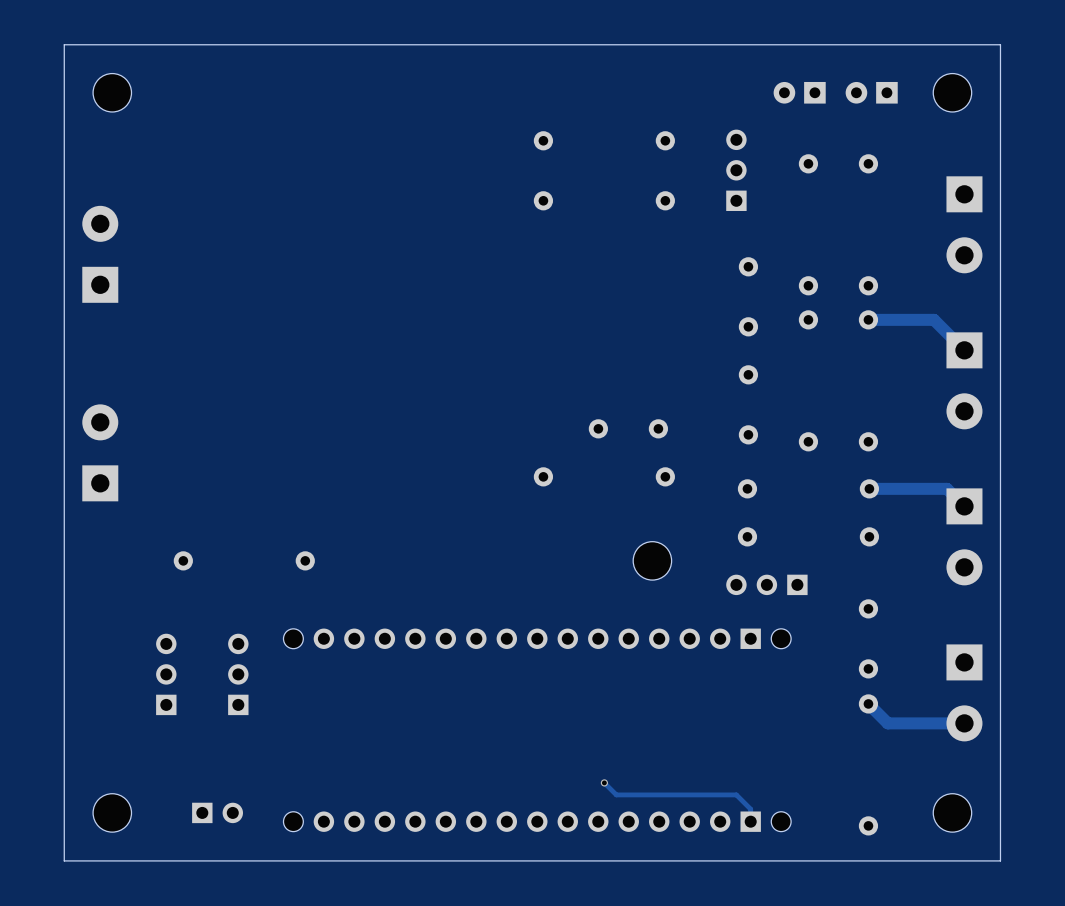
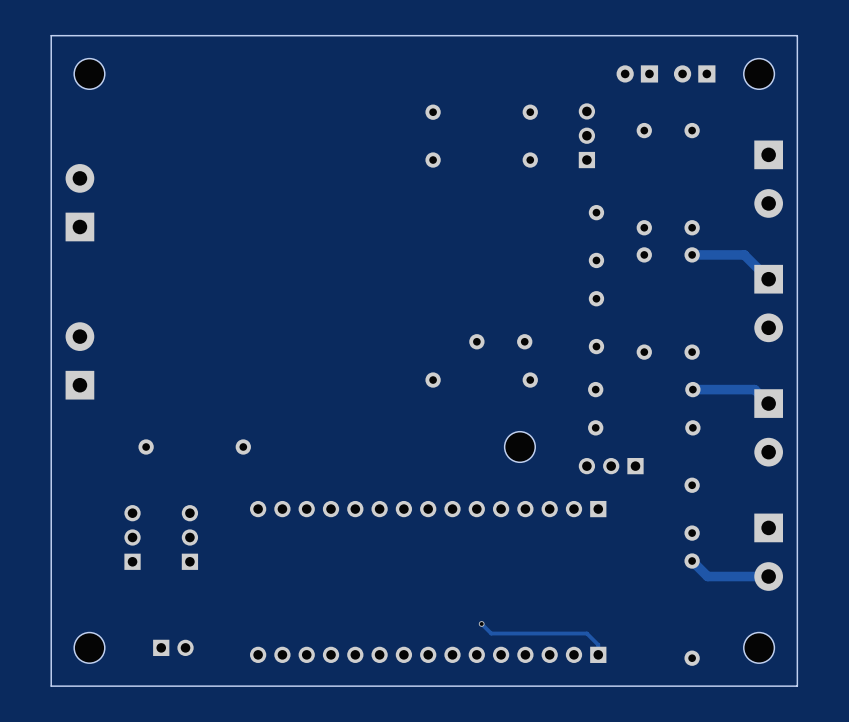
part: (293, 638) -> none
part: (781, 638) -> none
part: (293, 821) -> none
part: (781, 821) -> none

